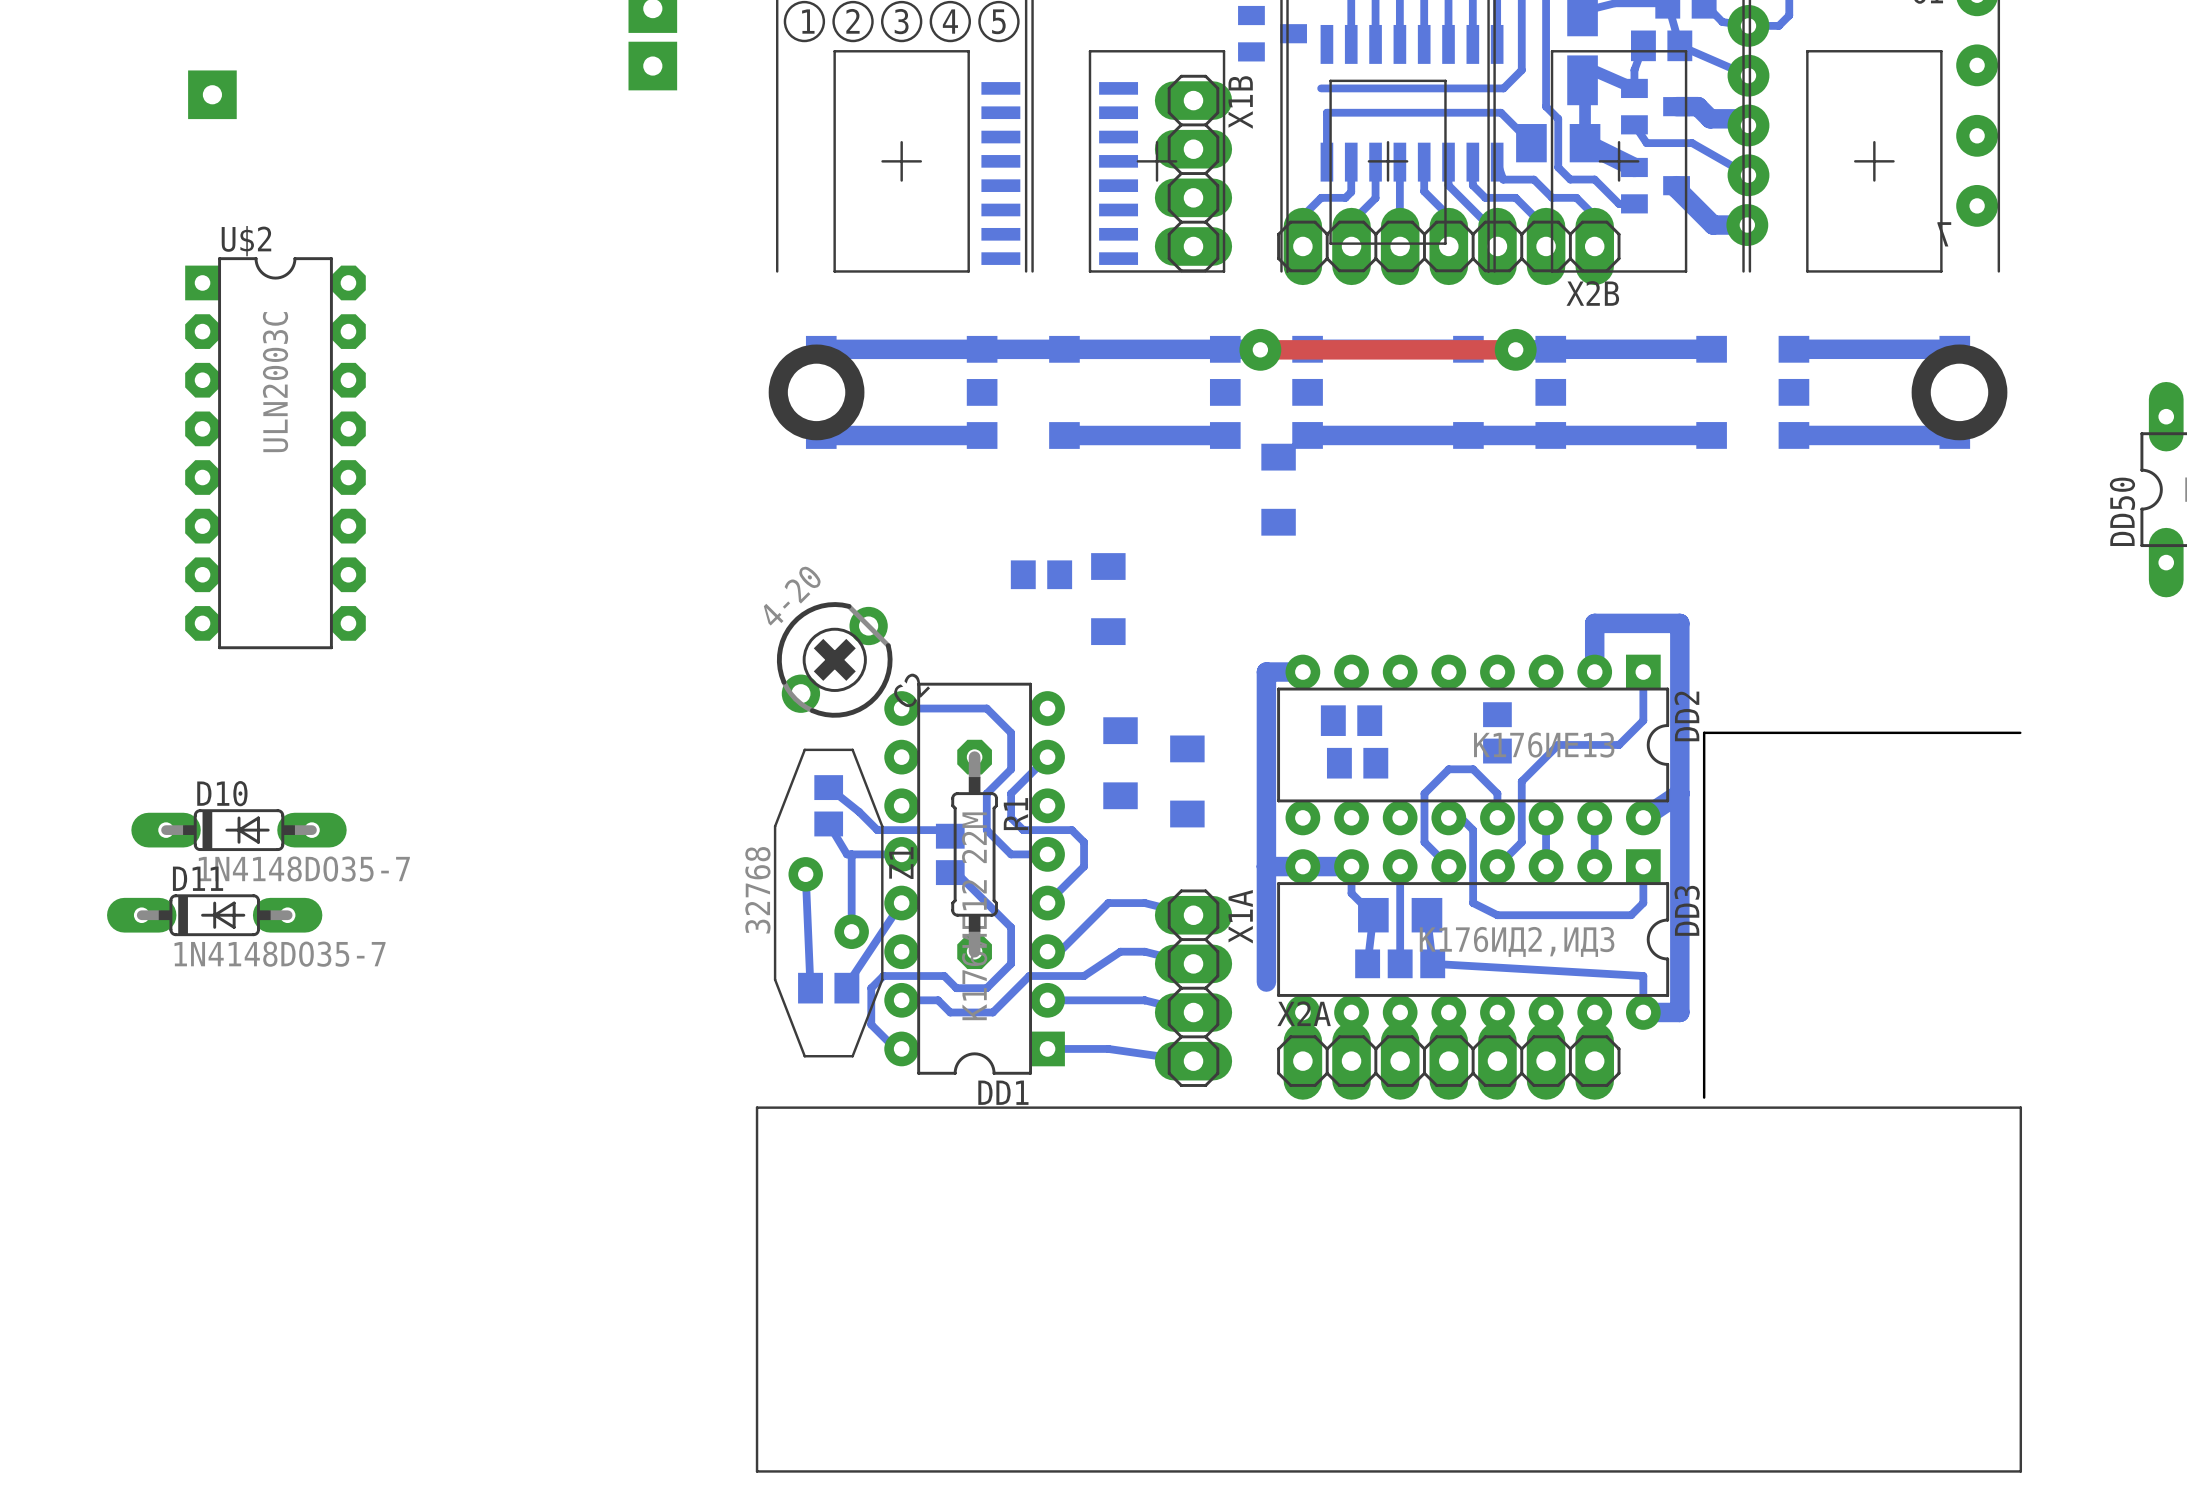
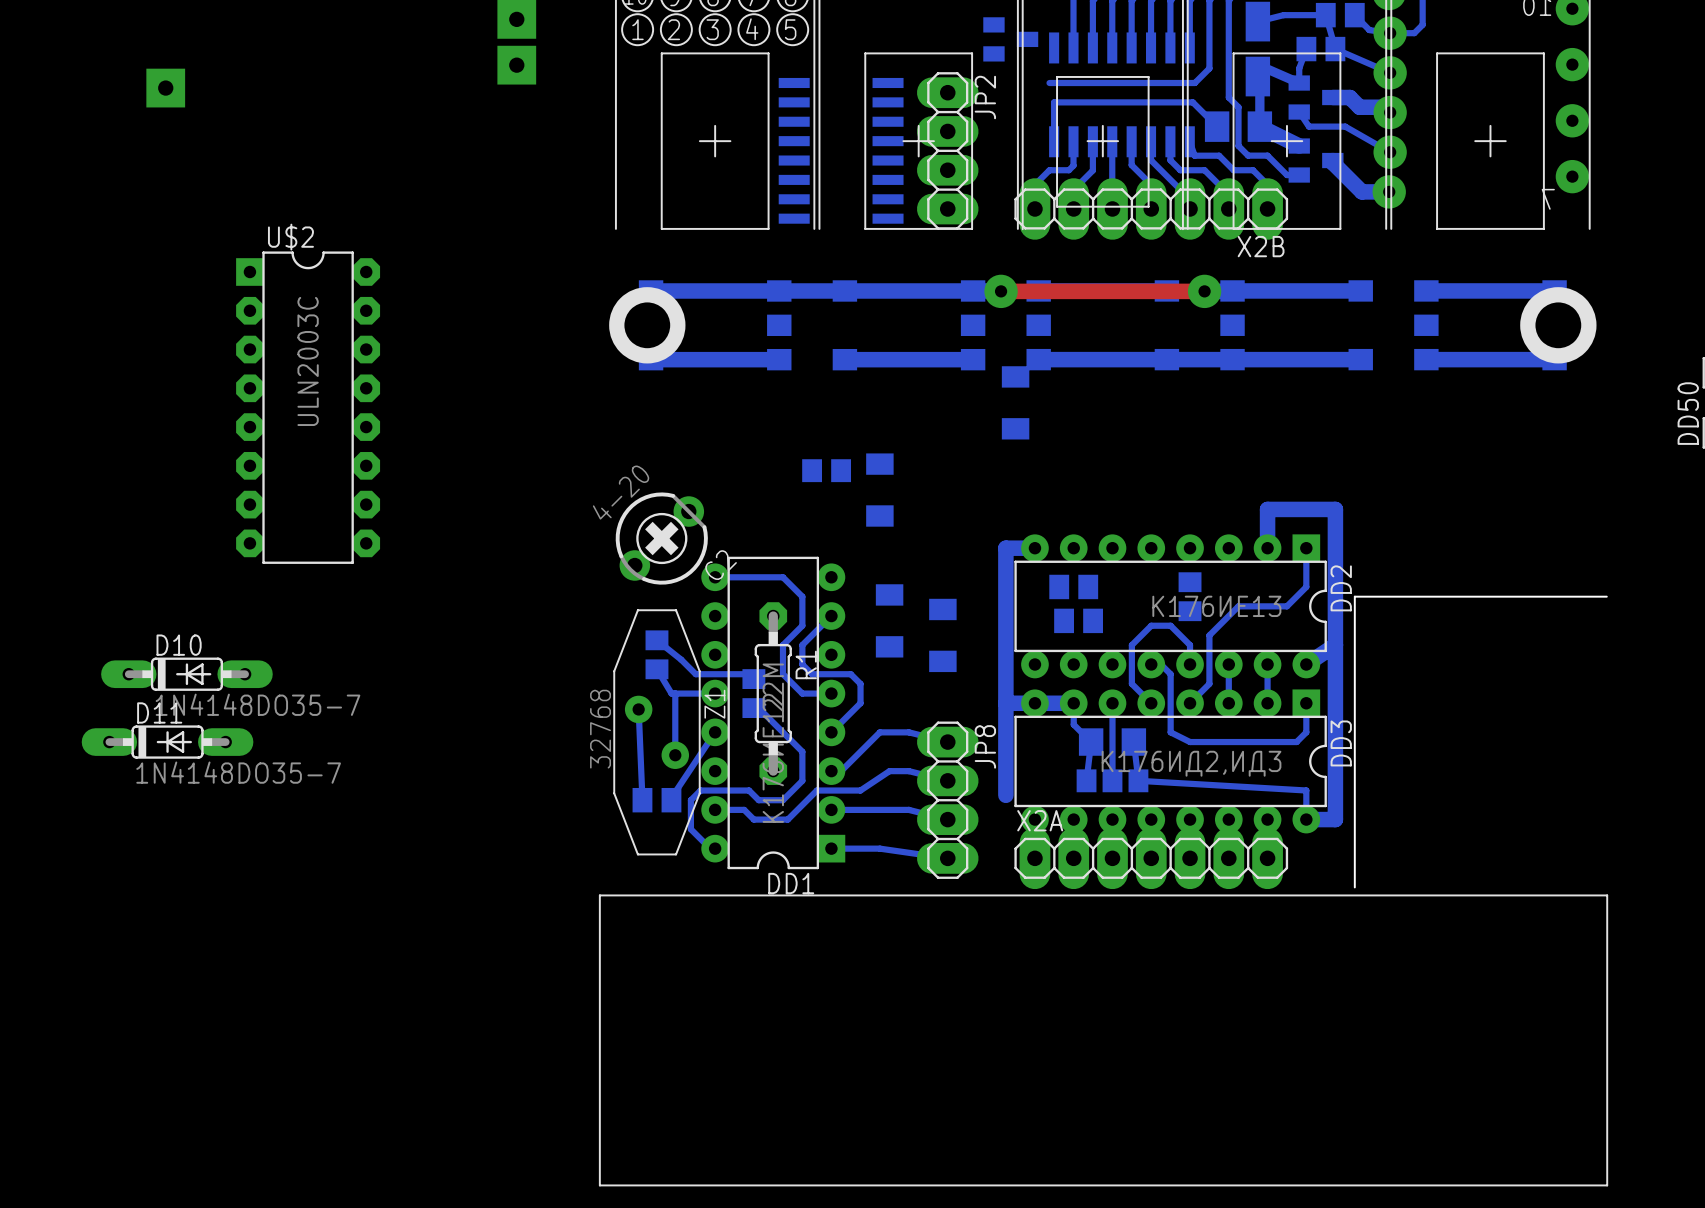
X1B name: X1B (1240, 102) -> JP2 (985, 97)
U$2 position: (275, 453) -> (308, 407)
X1A name: X1A (1240, 916) -> JP8 (985, 746)

